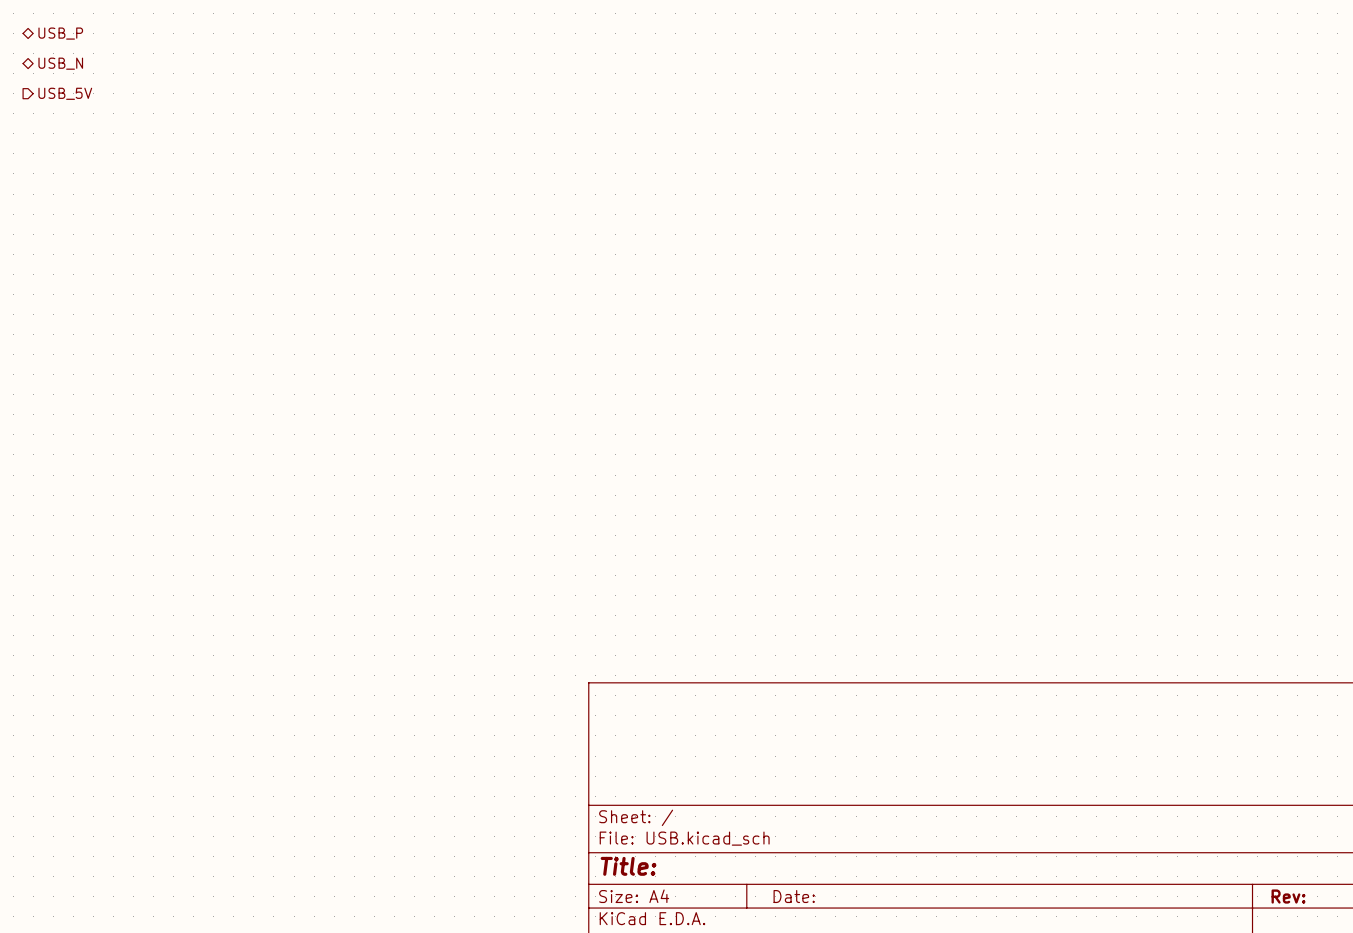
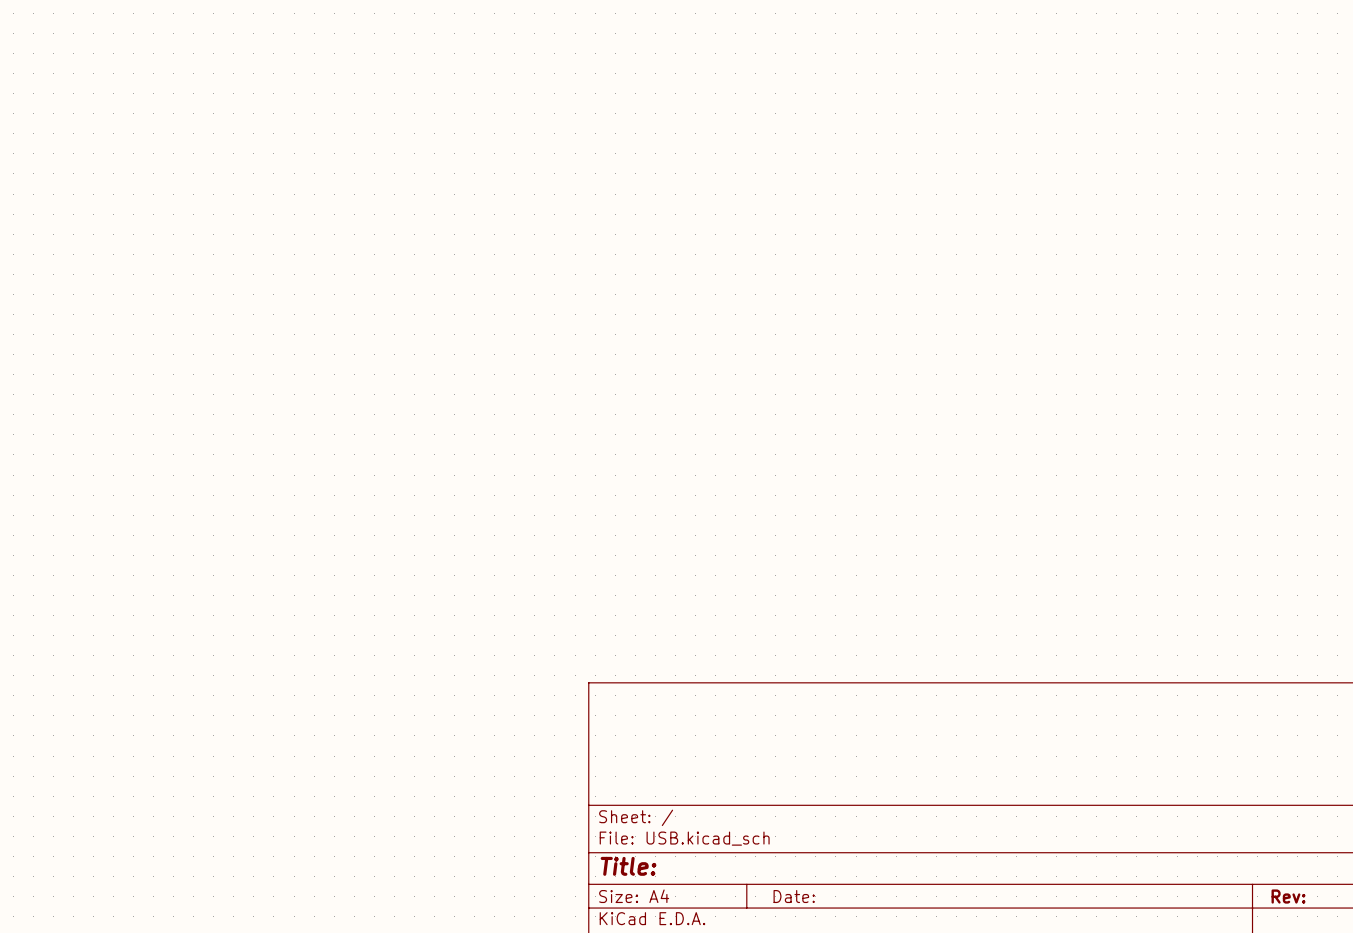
hierarchical label: USB_P (60, 33) -> none
hierarchical label: USB_N (60, 63) -> none
hierarchical label: USB_5V (65, 93) -> none

